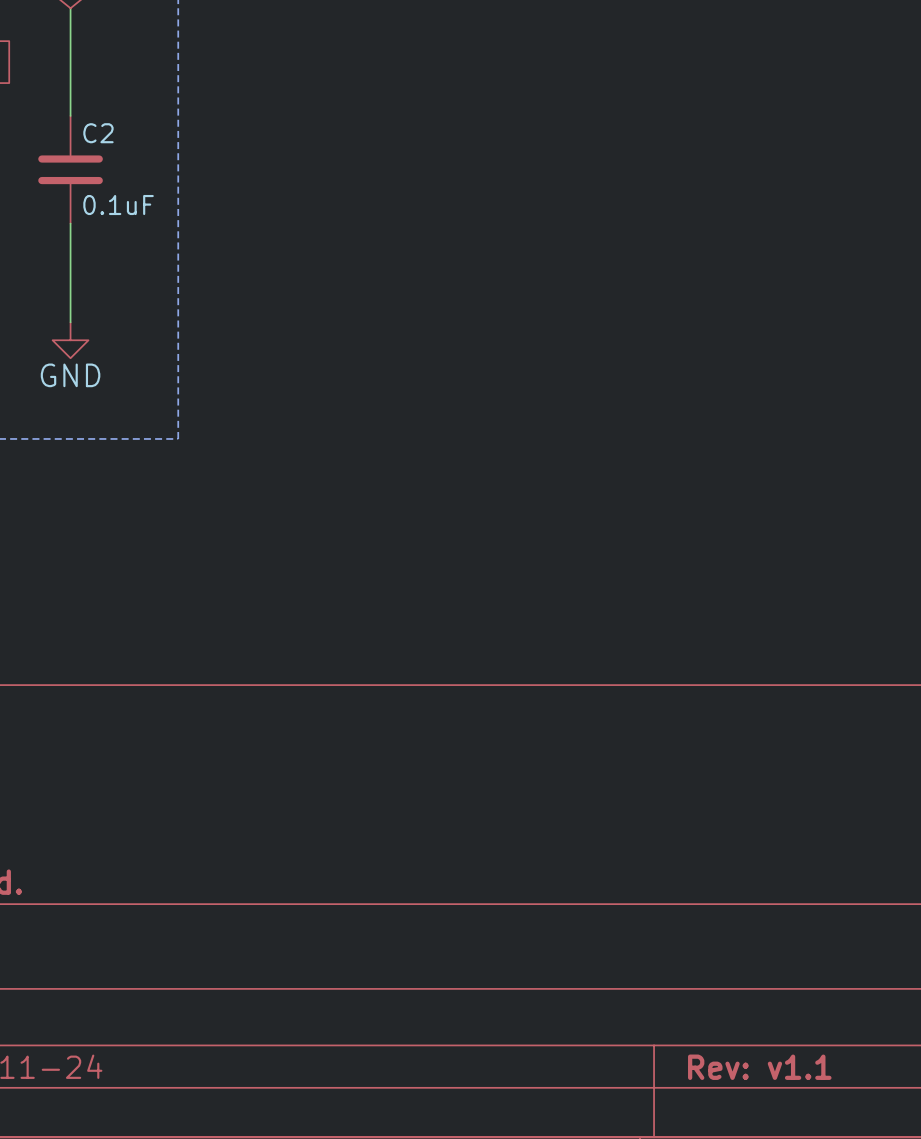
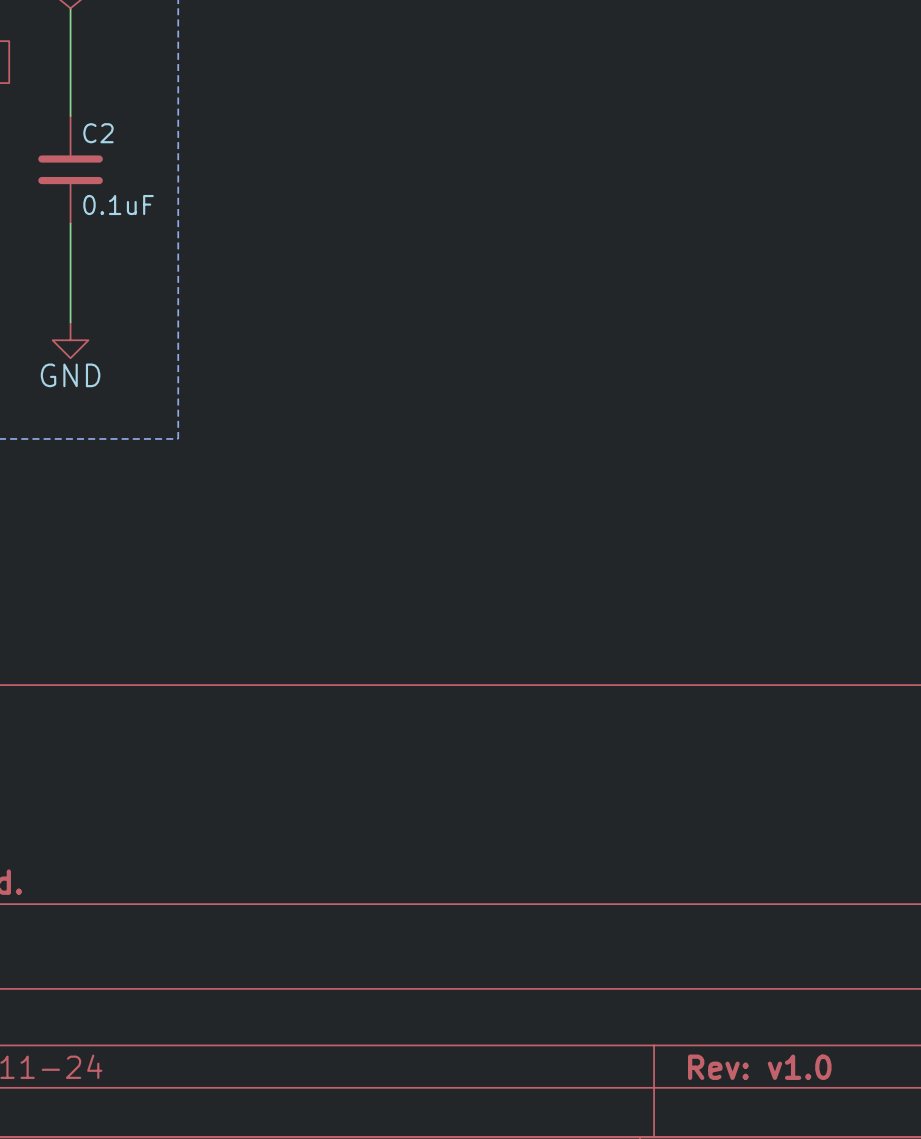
title block: Rev: v1.1 (759, 1067) -> Rev: v1.0 (759, 1067)

